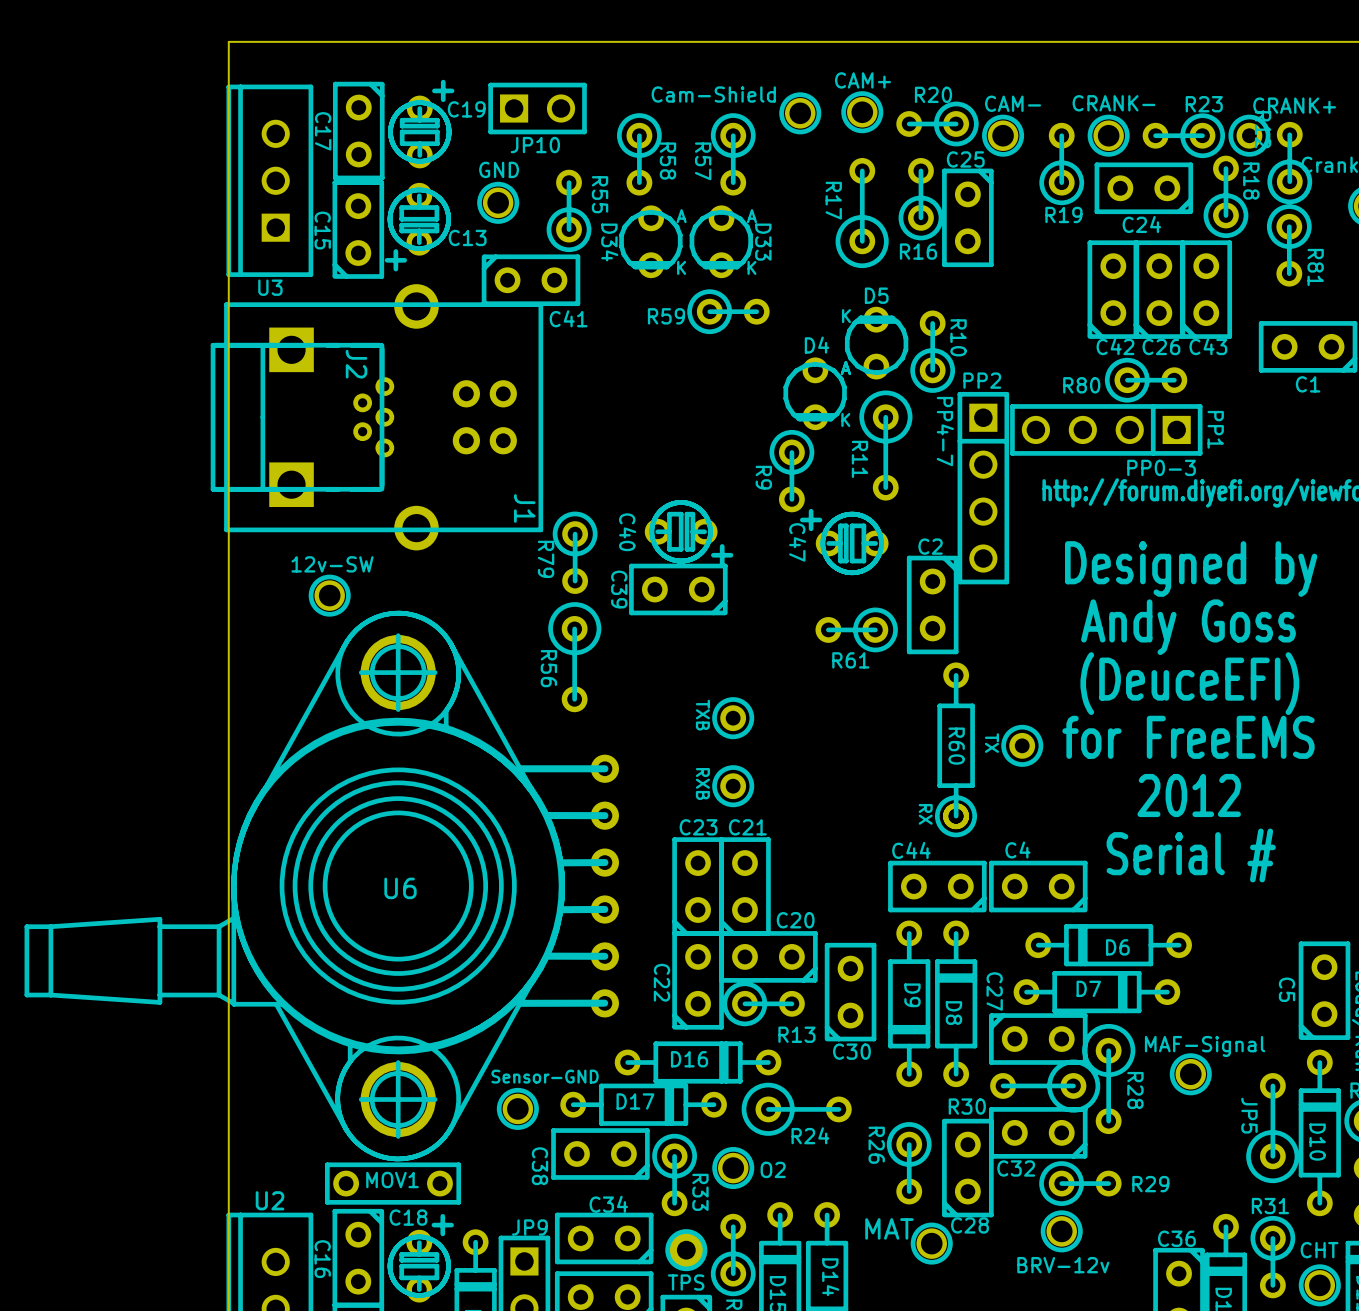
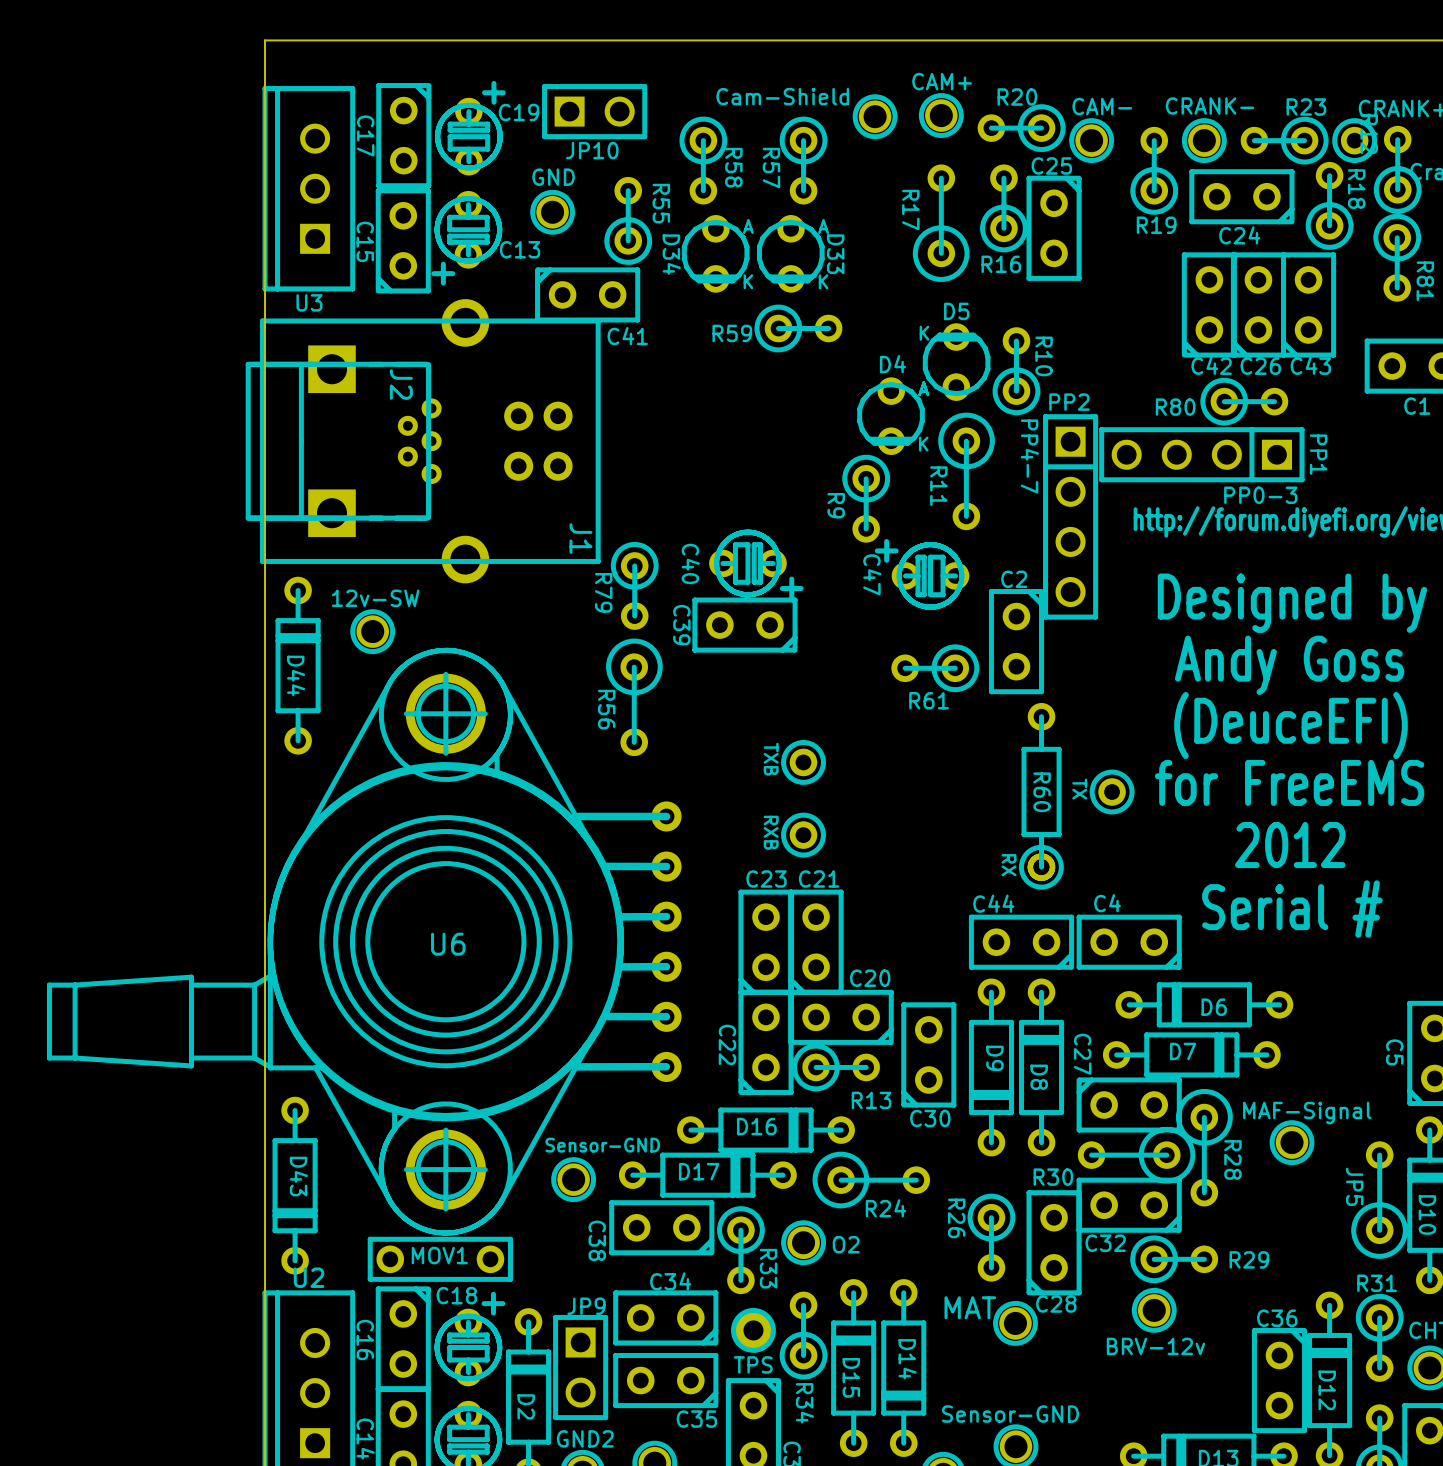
D44: none -> (298, 665)
D43: none -> (295, 1185)

